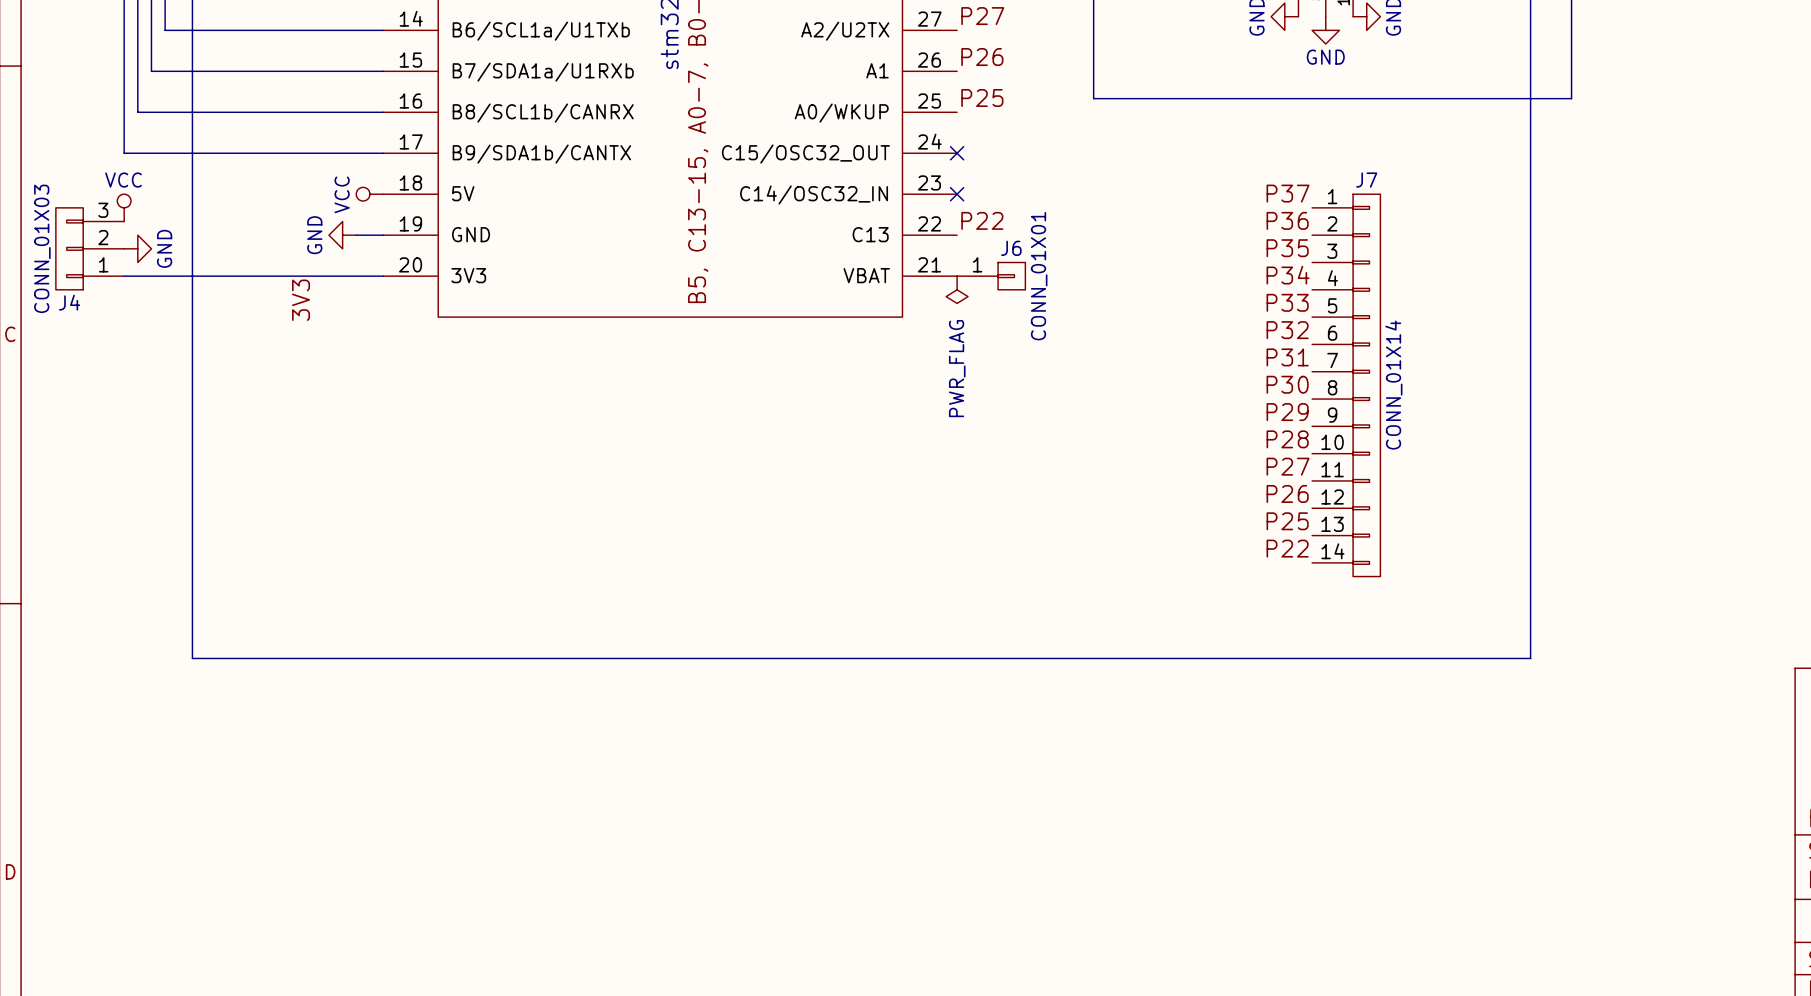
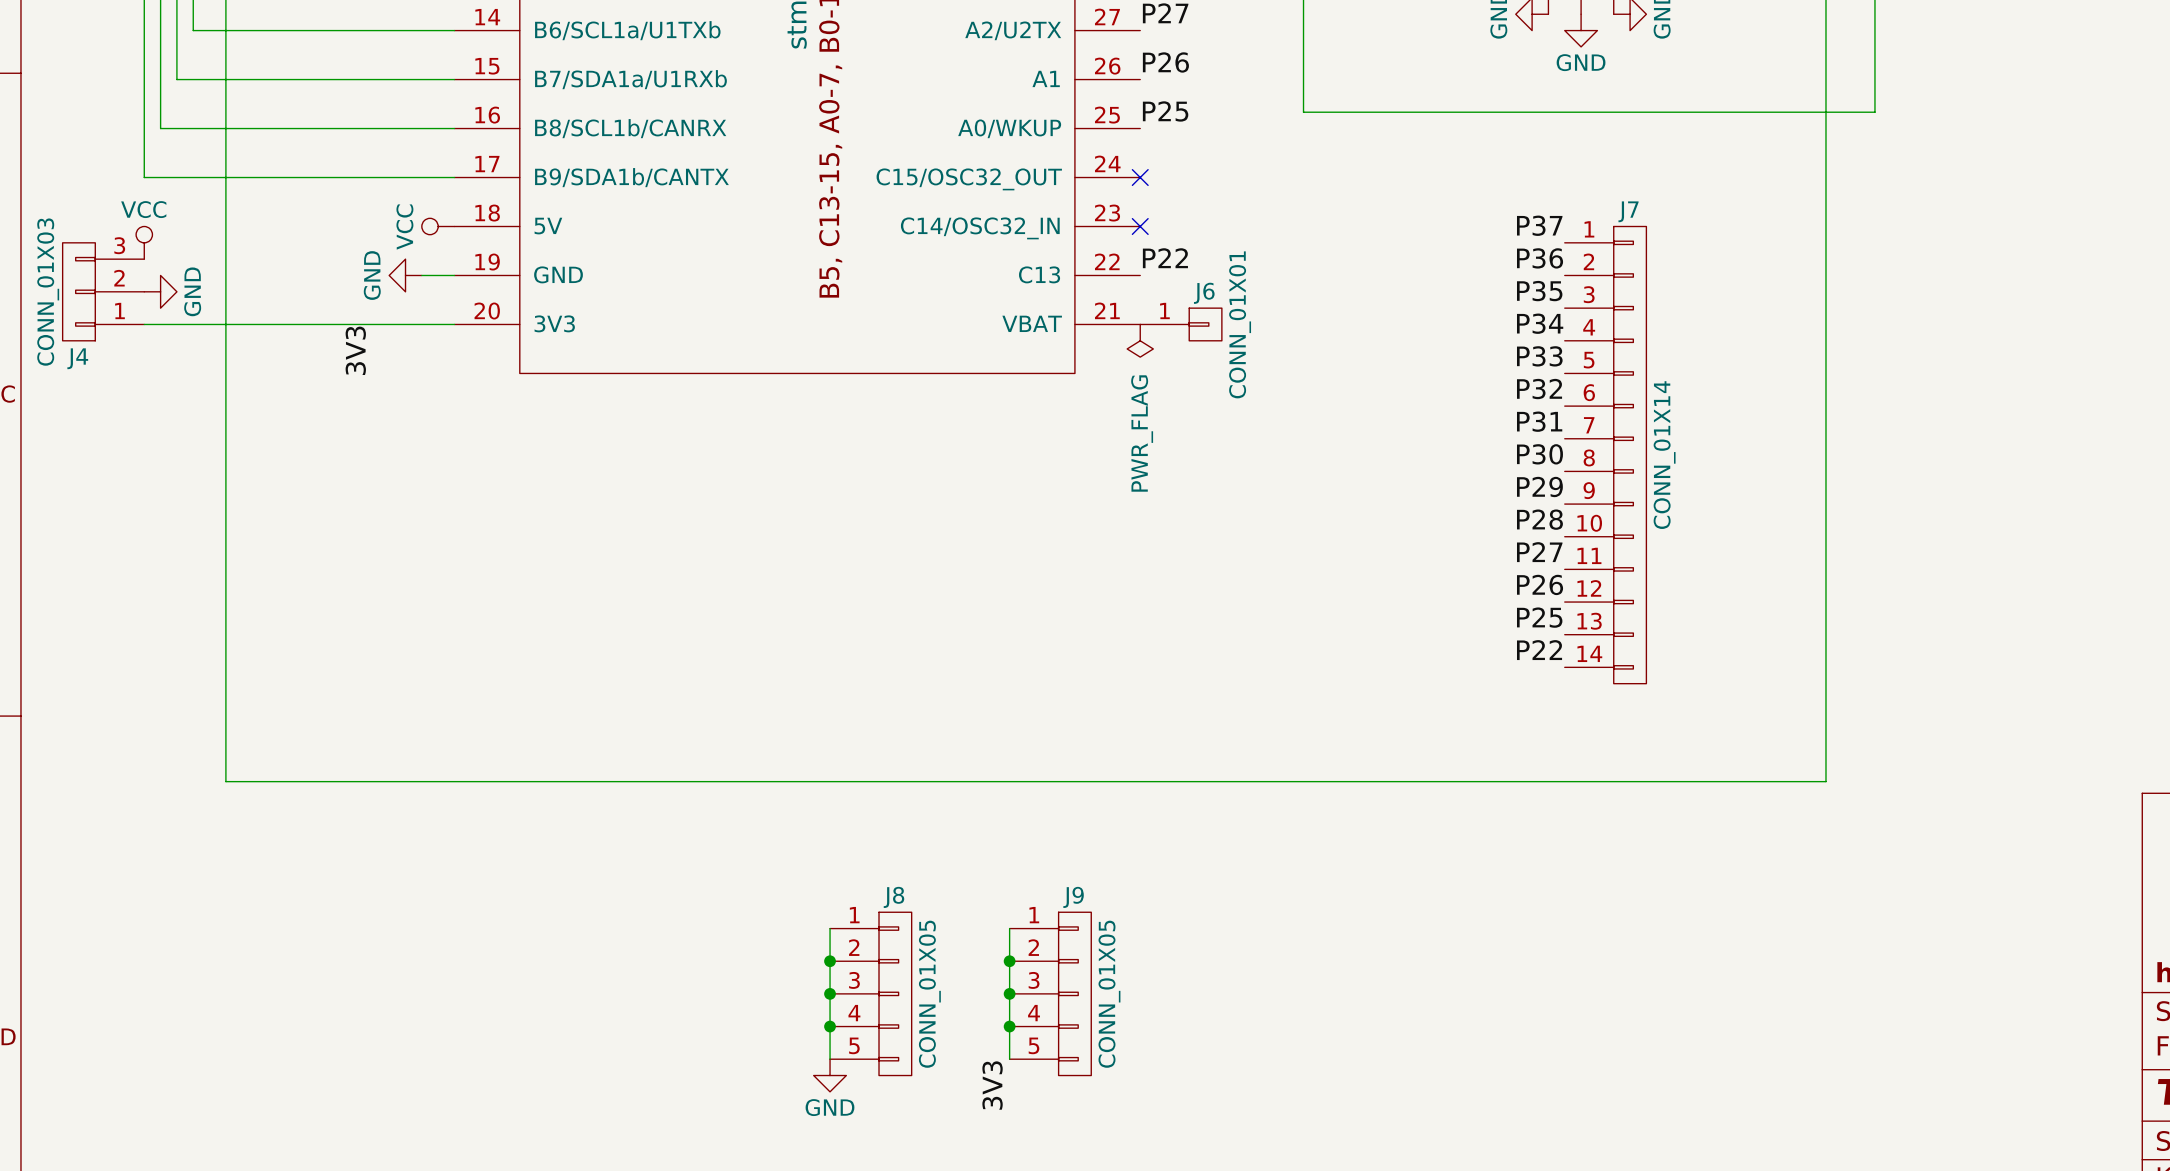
wire: none -> (830, 928) (830, 1059)
wire: none -> (1009, 928) (1009, 1059)
junction: none -> (830, 961)
junction: none -> (1009, 961)
junction: none -> (830, 993)
J8: none -> CONN_01X05 (870, 993)
junction: none -> (1009, 993)
J9: none -> CONN_01X05 (1050, 993)
junction: none -> (830, 1026)
junction: none -> (1009, 1026)
power symbol: none -> GND (830, 1075)
label: none -> 3V3 (992, 1085)

